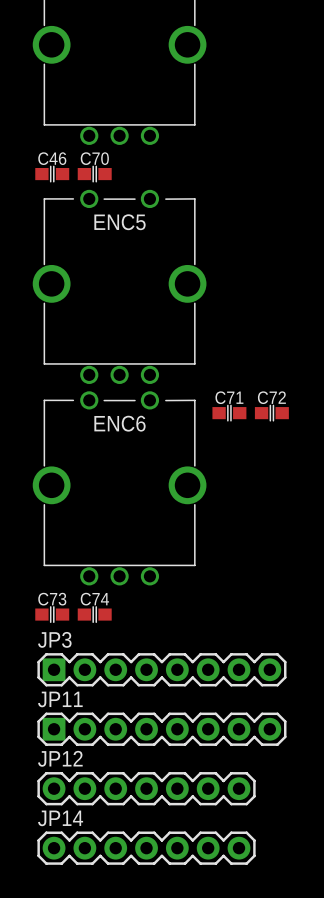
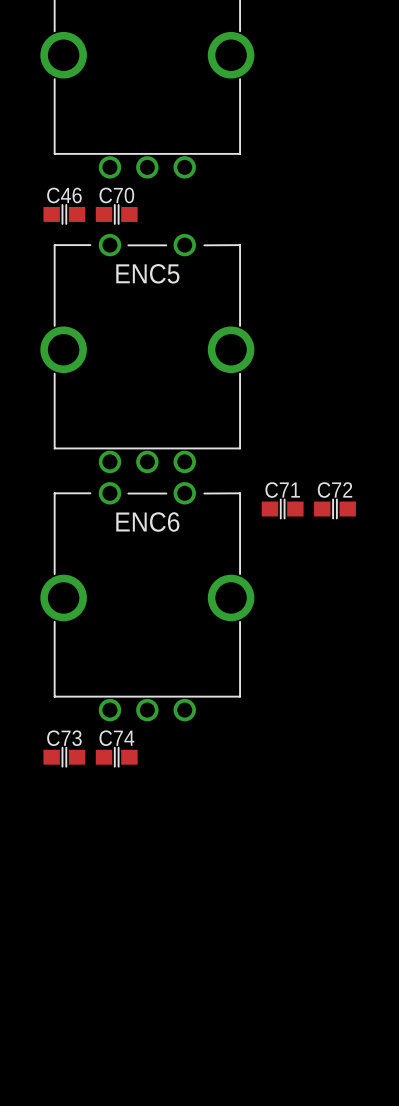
JP3: (161, 669) -> none
JP11: (161, 729) -> none
JP12: (146, 788) -> none
JP14: (146, 848) -> none

